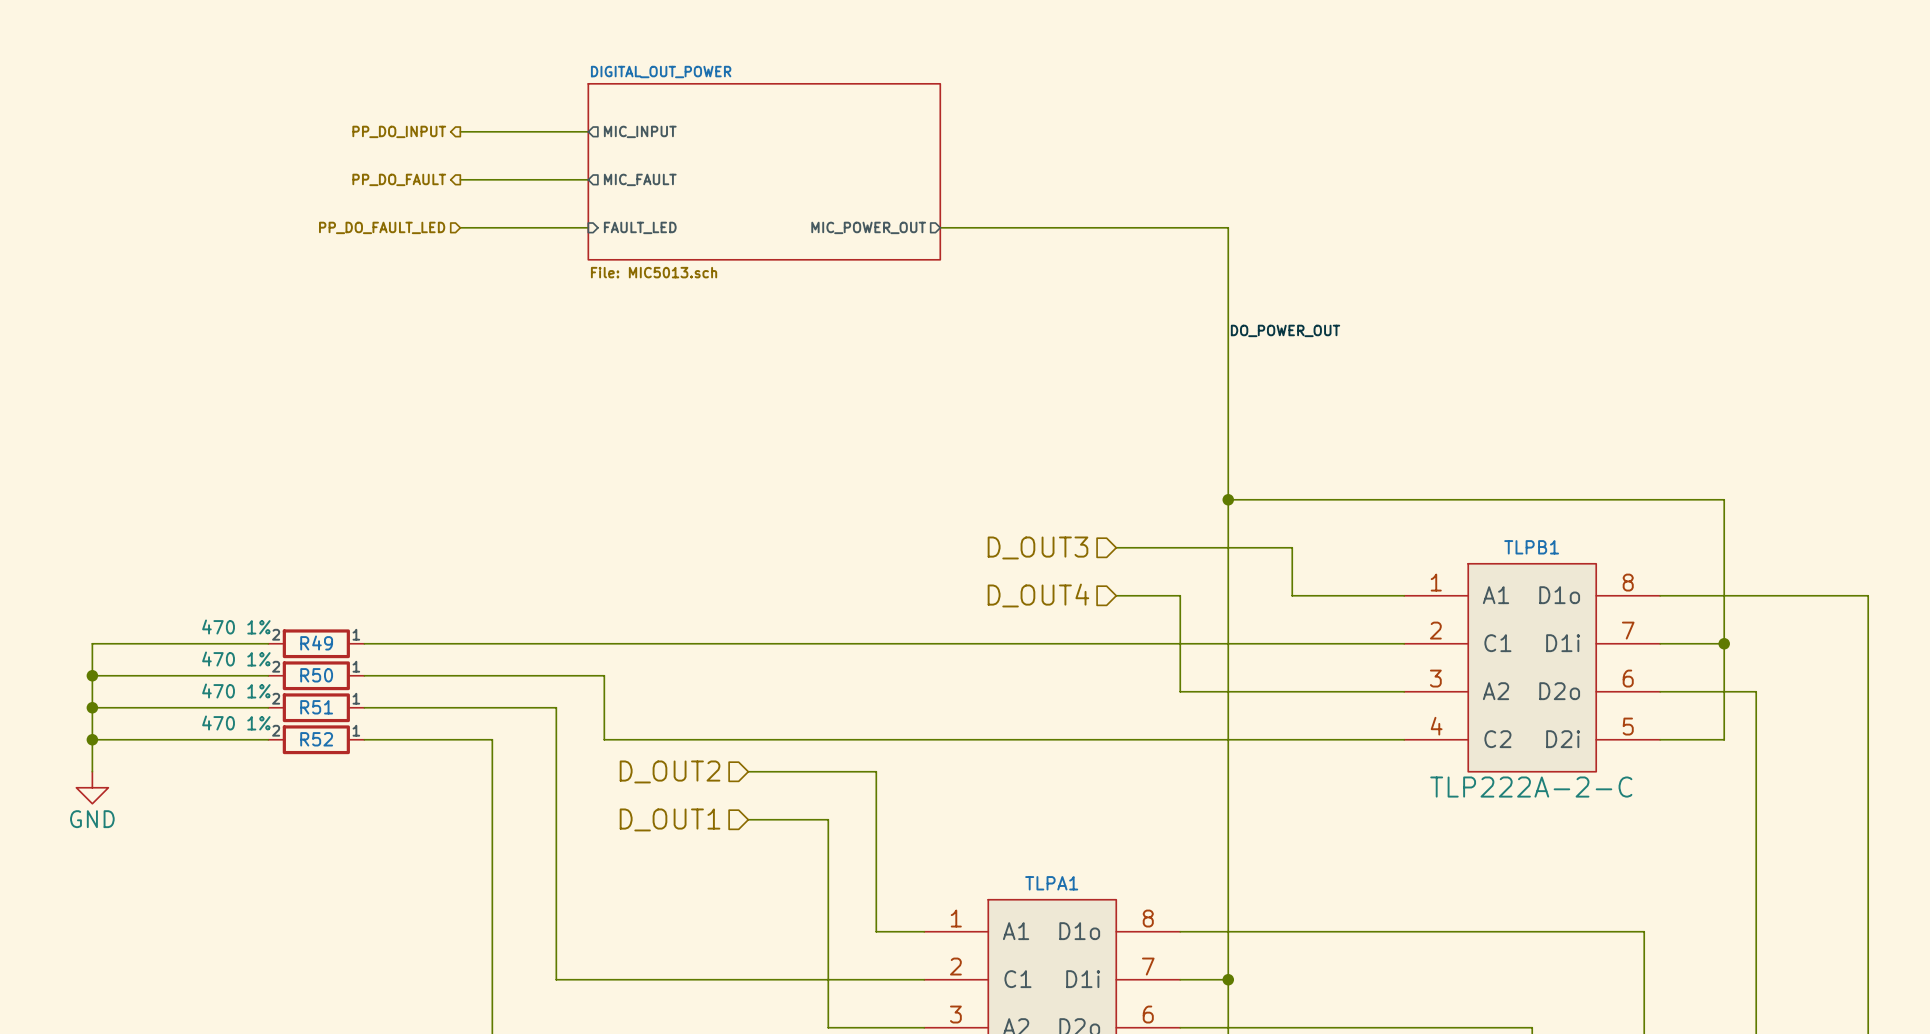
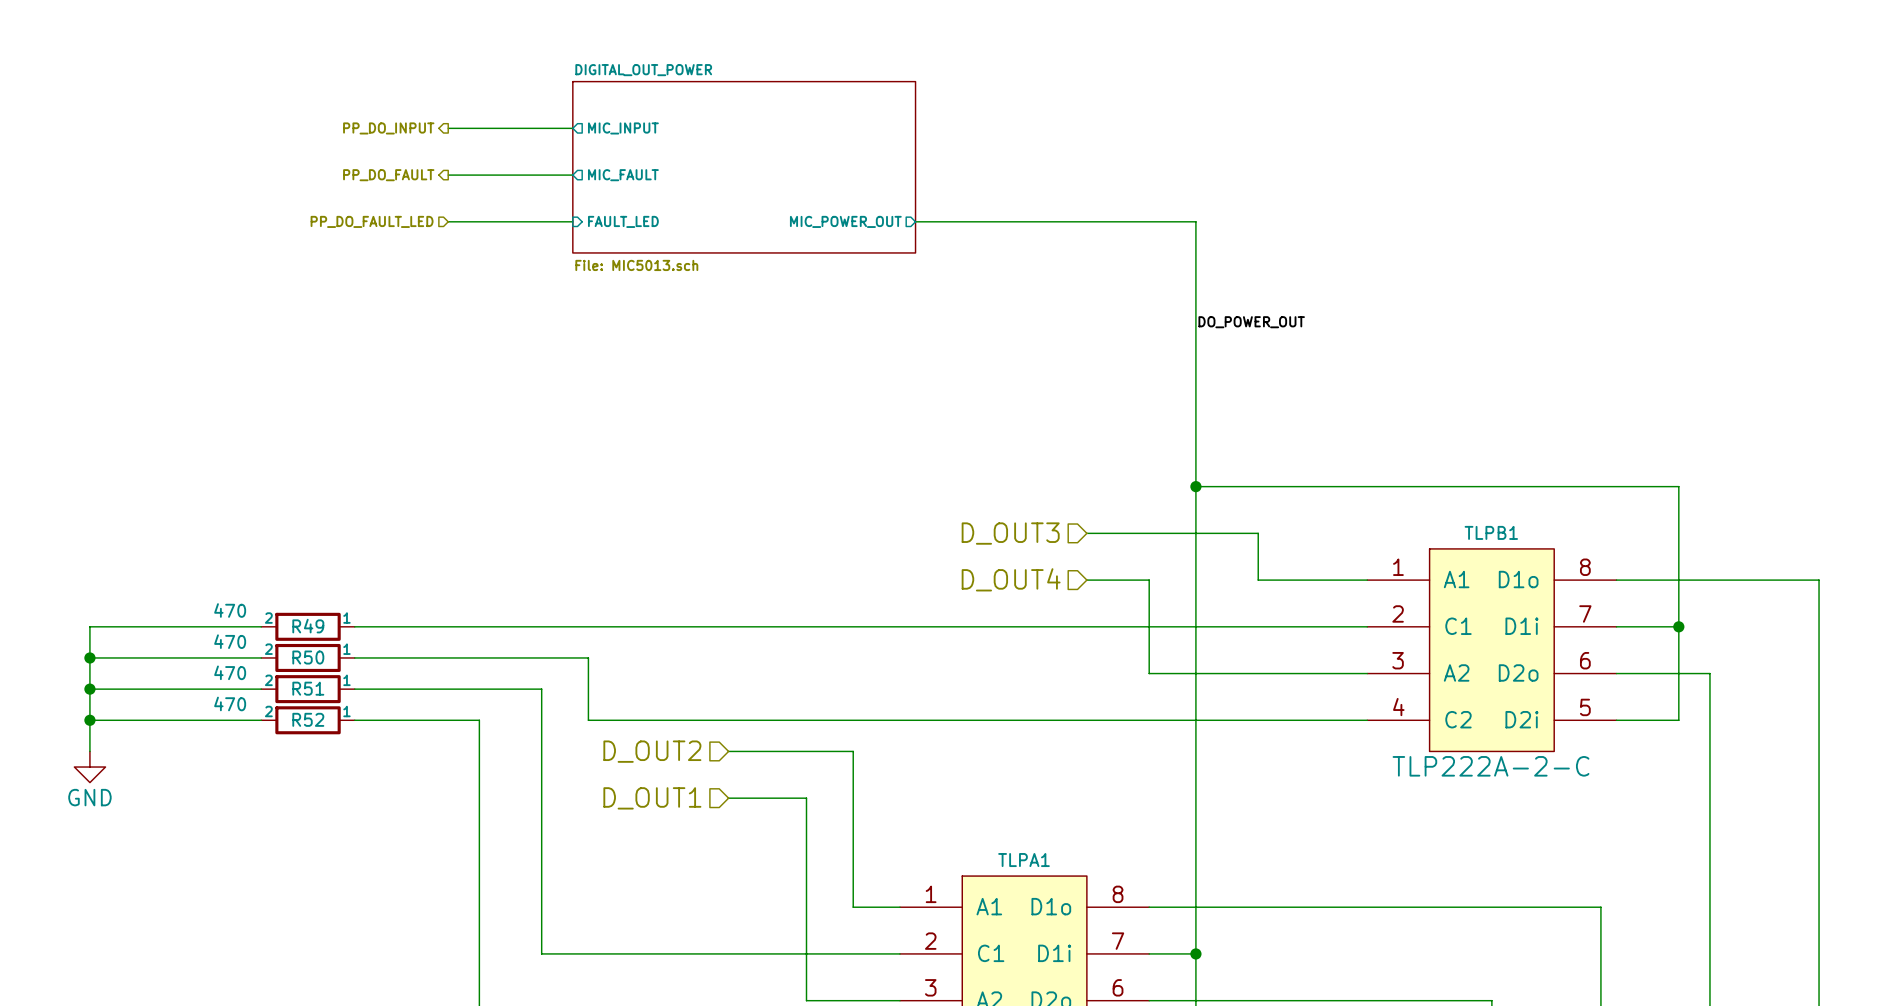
R49 value: 470 1% (236, 627) -> 470 (230, 610)
R50 value: 470 1% (236, 659) -> 470 (230, 641)
R51 value: 470 1% (236, 691) -> 470 (230, 672)
R52 value: 470 1% (236, 722) -> 470 (230, 703)

